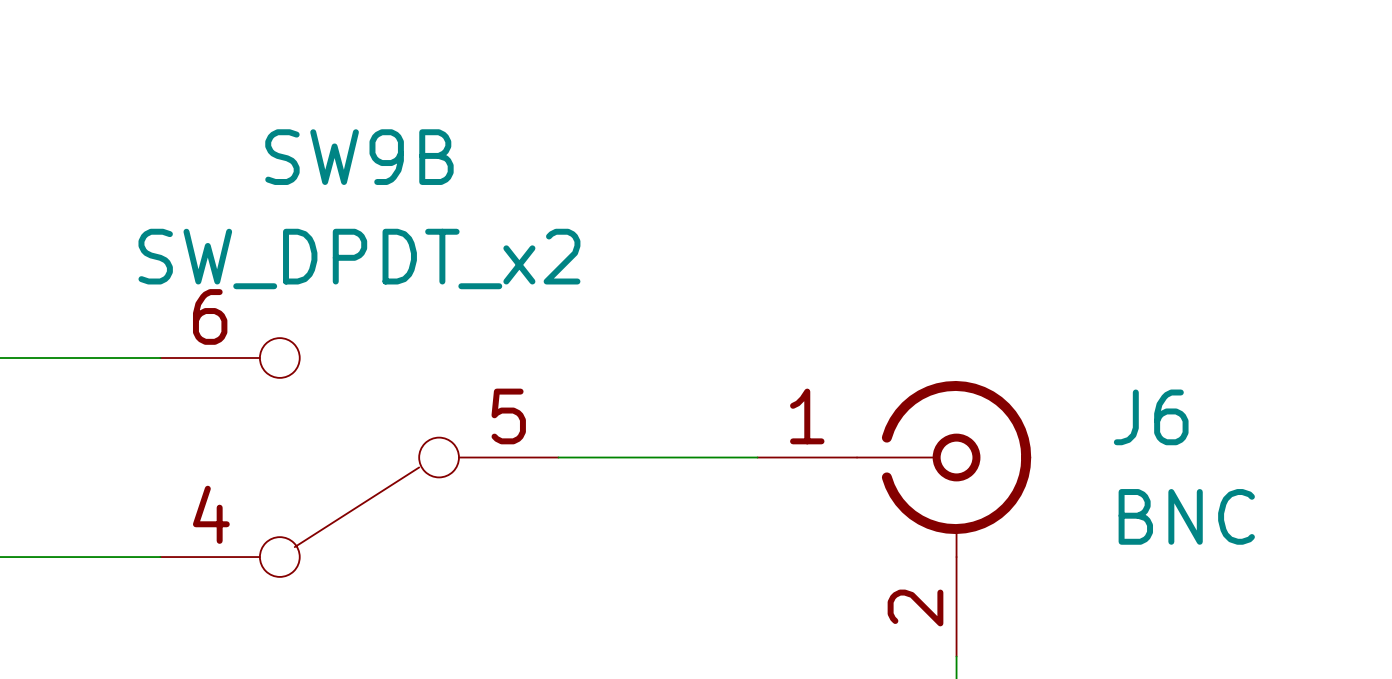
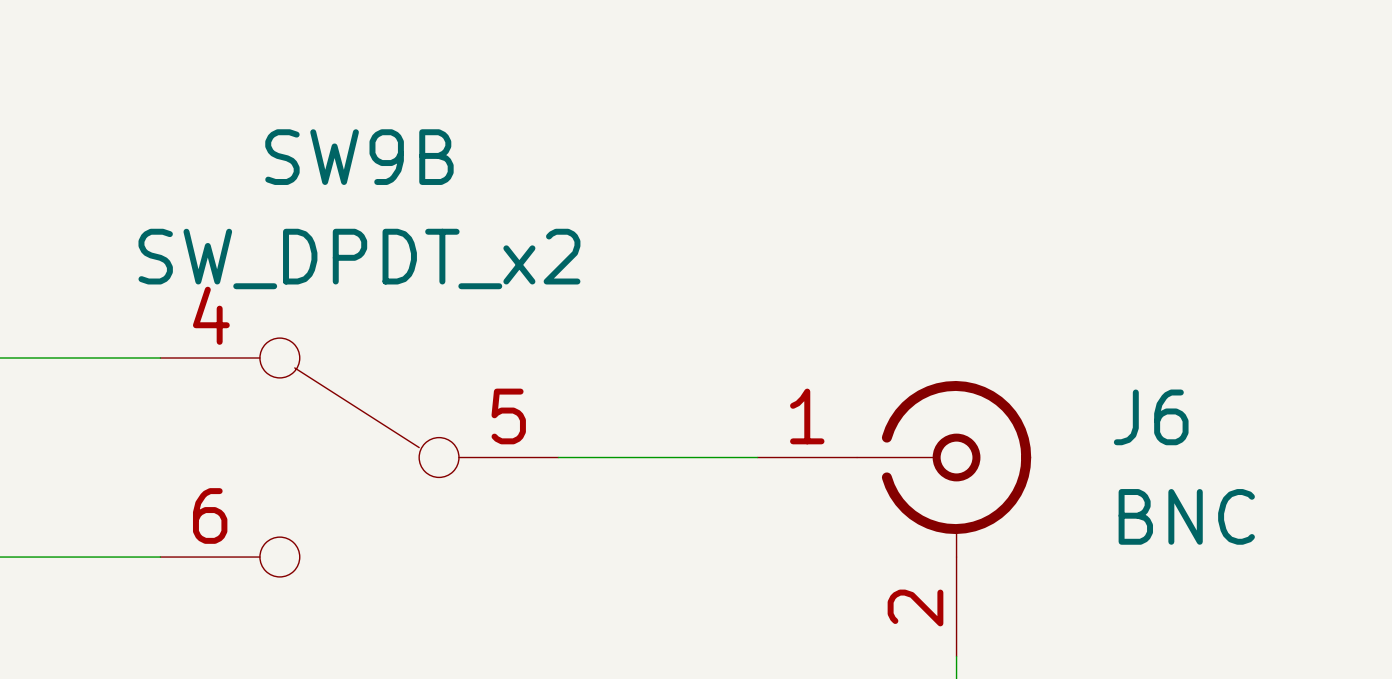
SW9B flip: as is (359, 457) -> up-down (359, 457)

